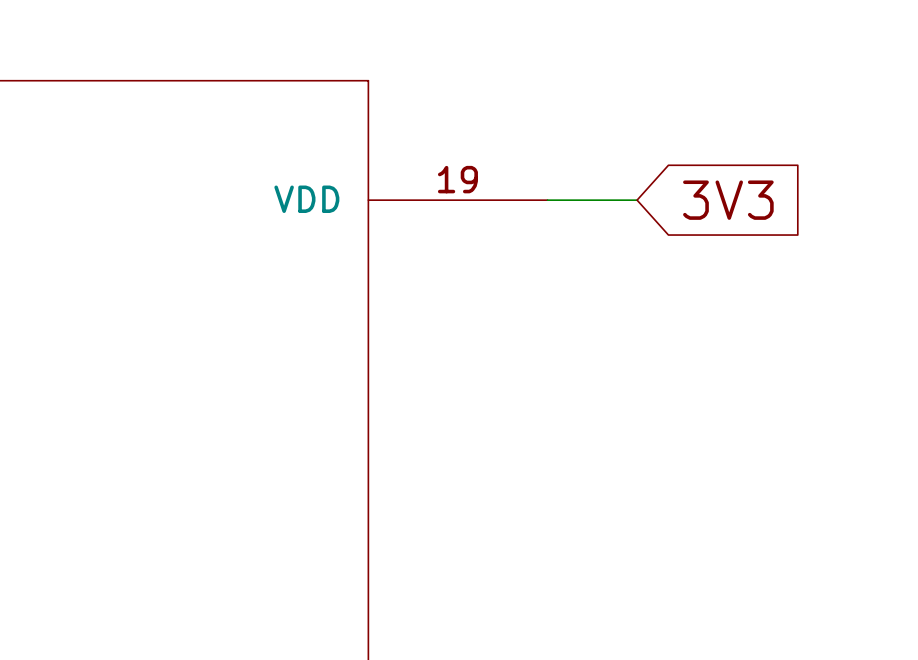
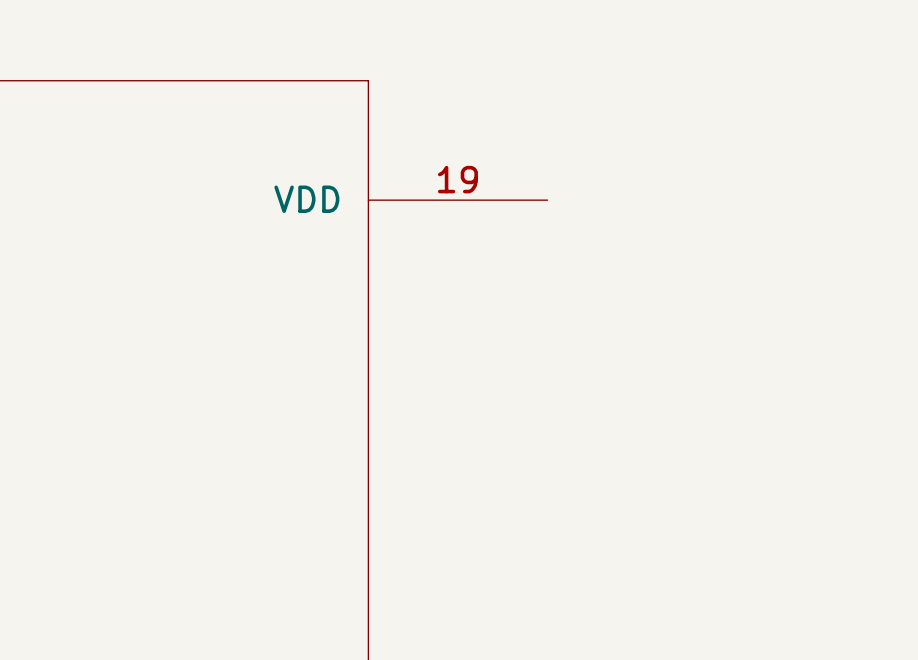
wire: (547, 200) (637, 200) -> none
global label: 3V3 (728, 200) -> none

